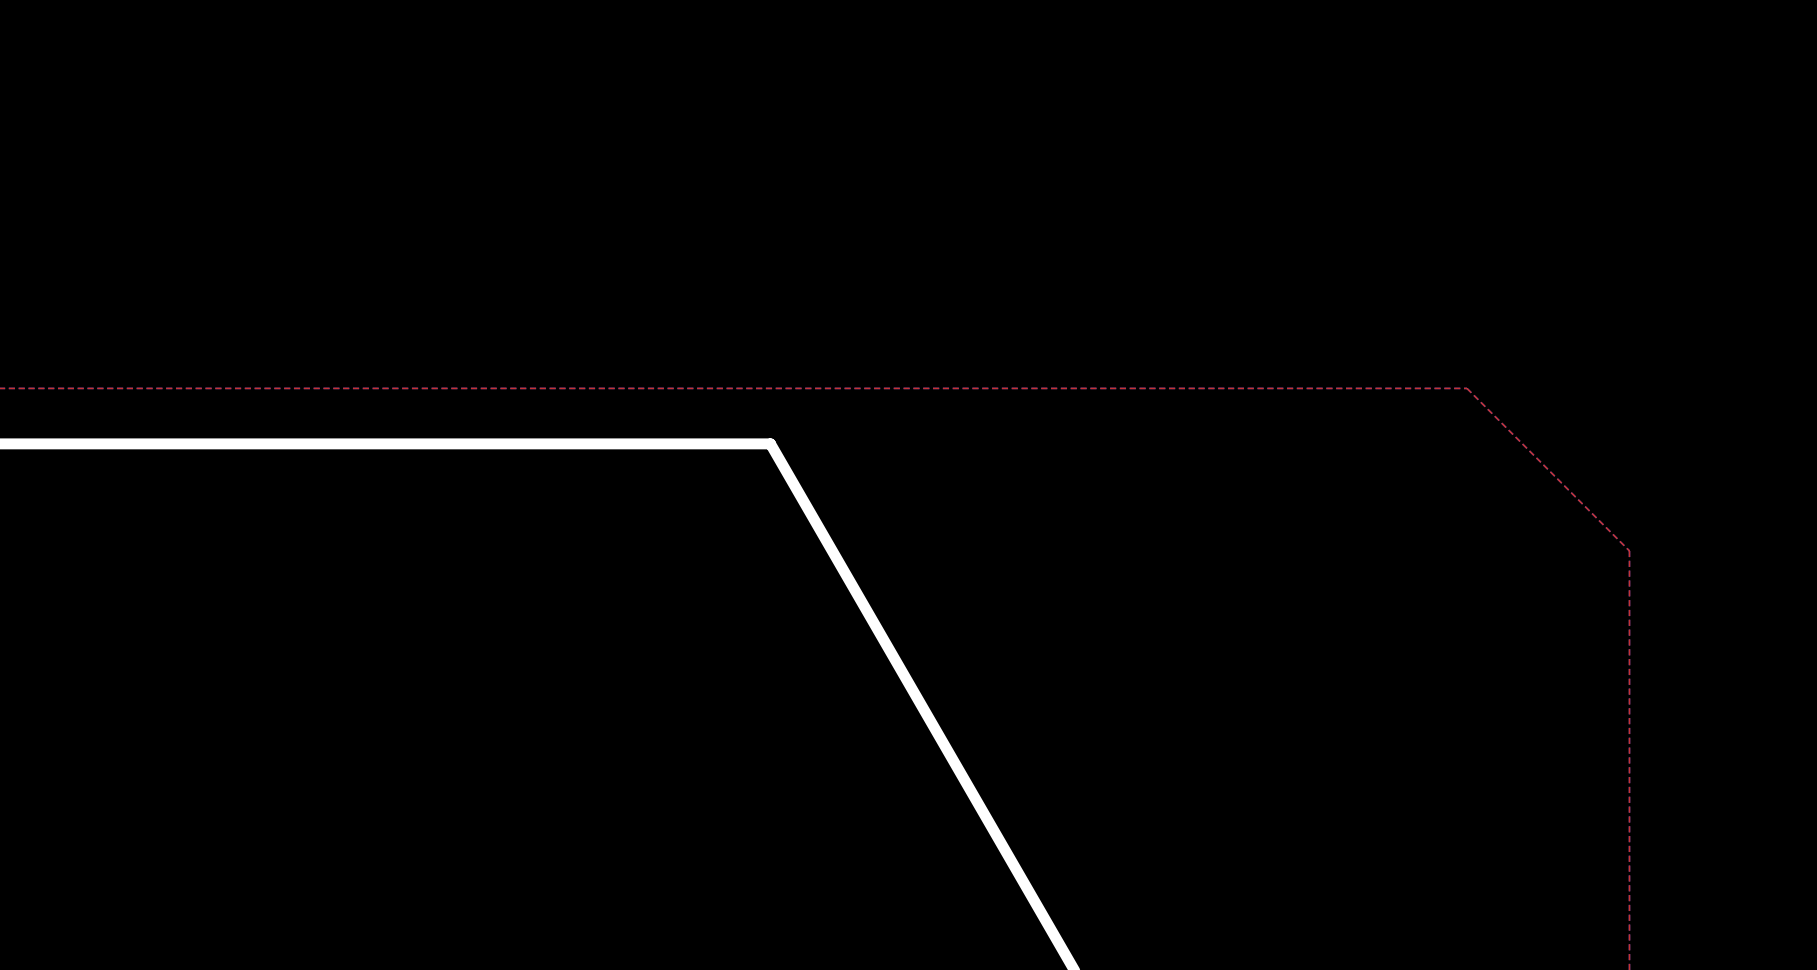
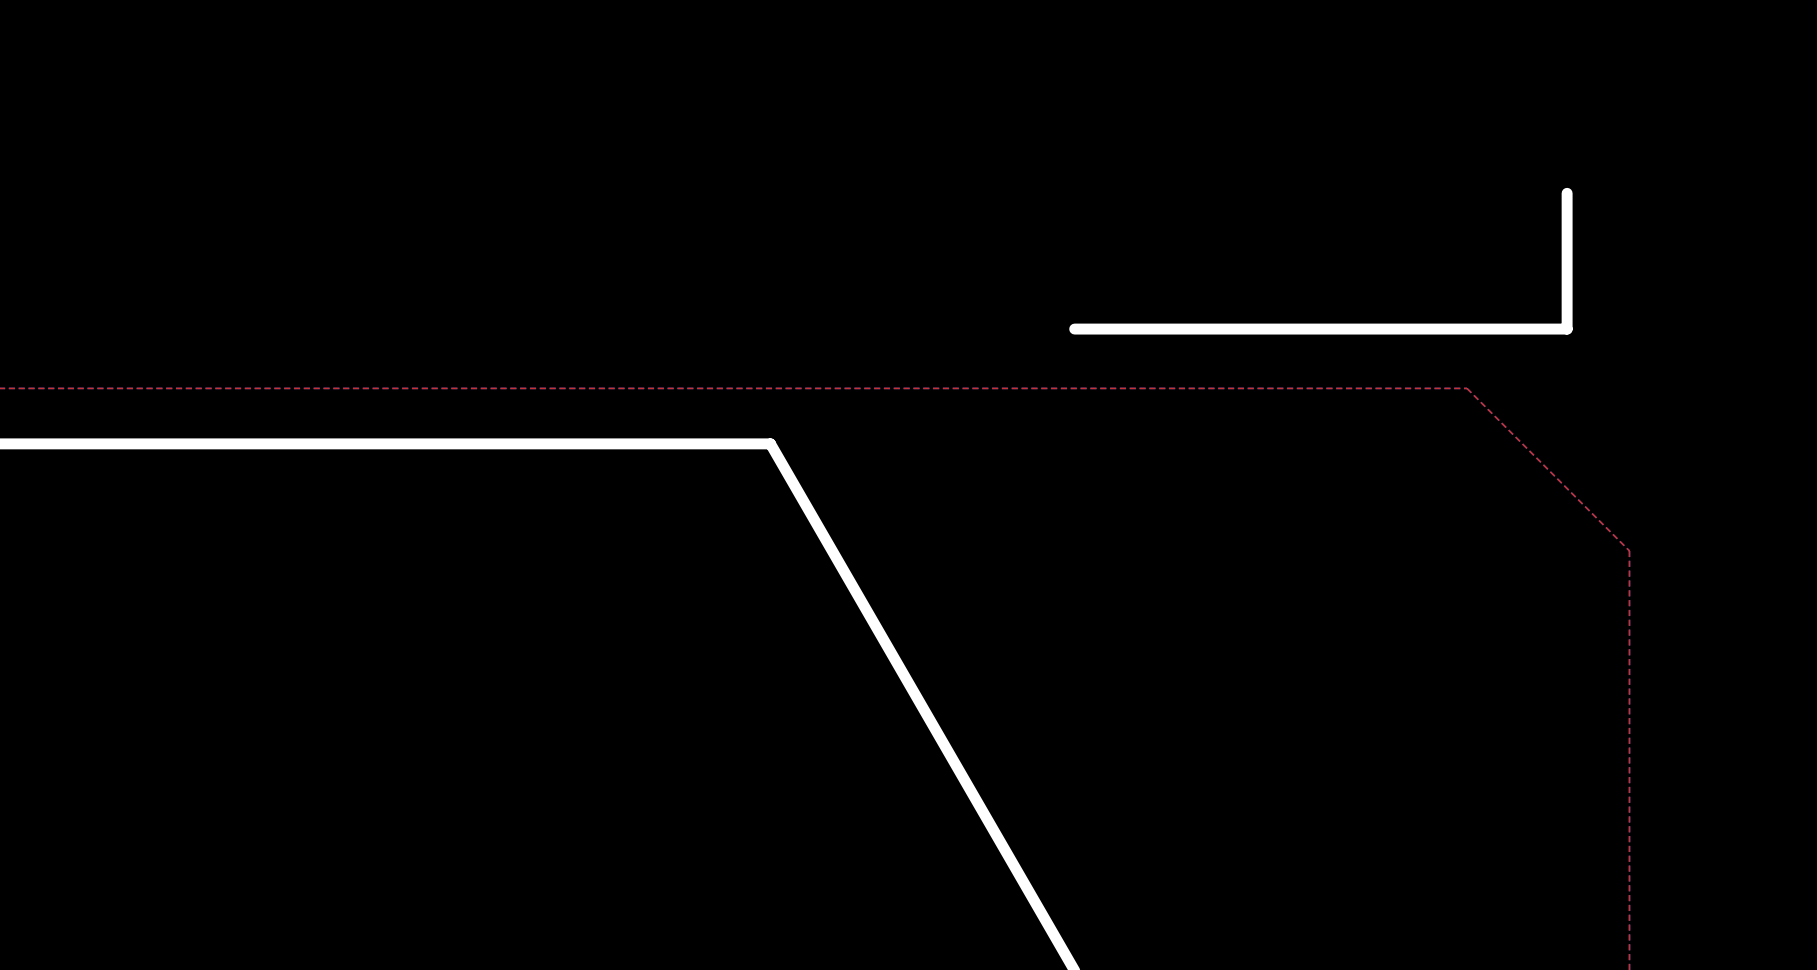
board edge: none -> (1567, 193) (1567, 329) (1074, 329)

